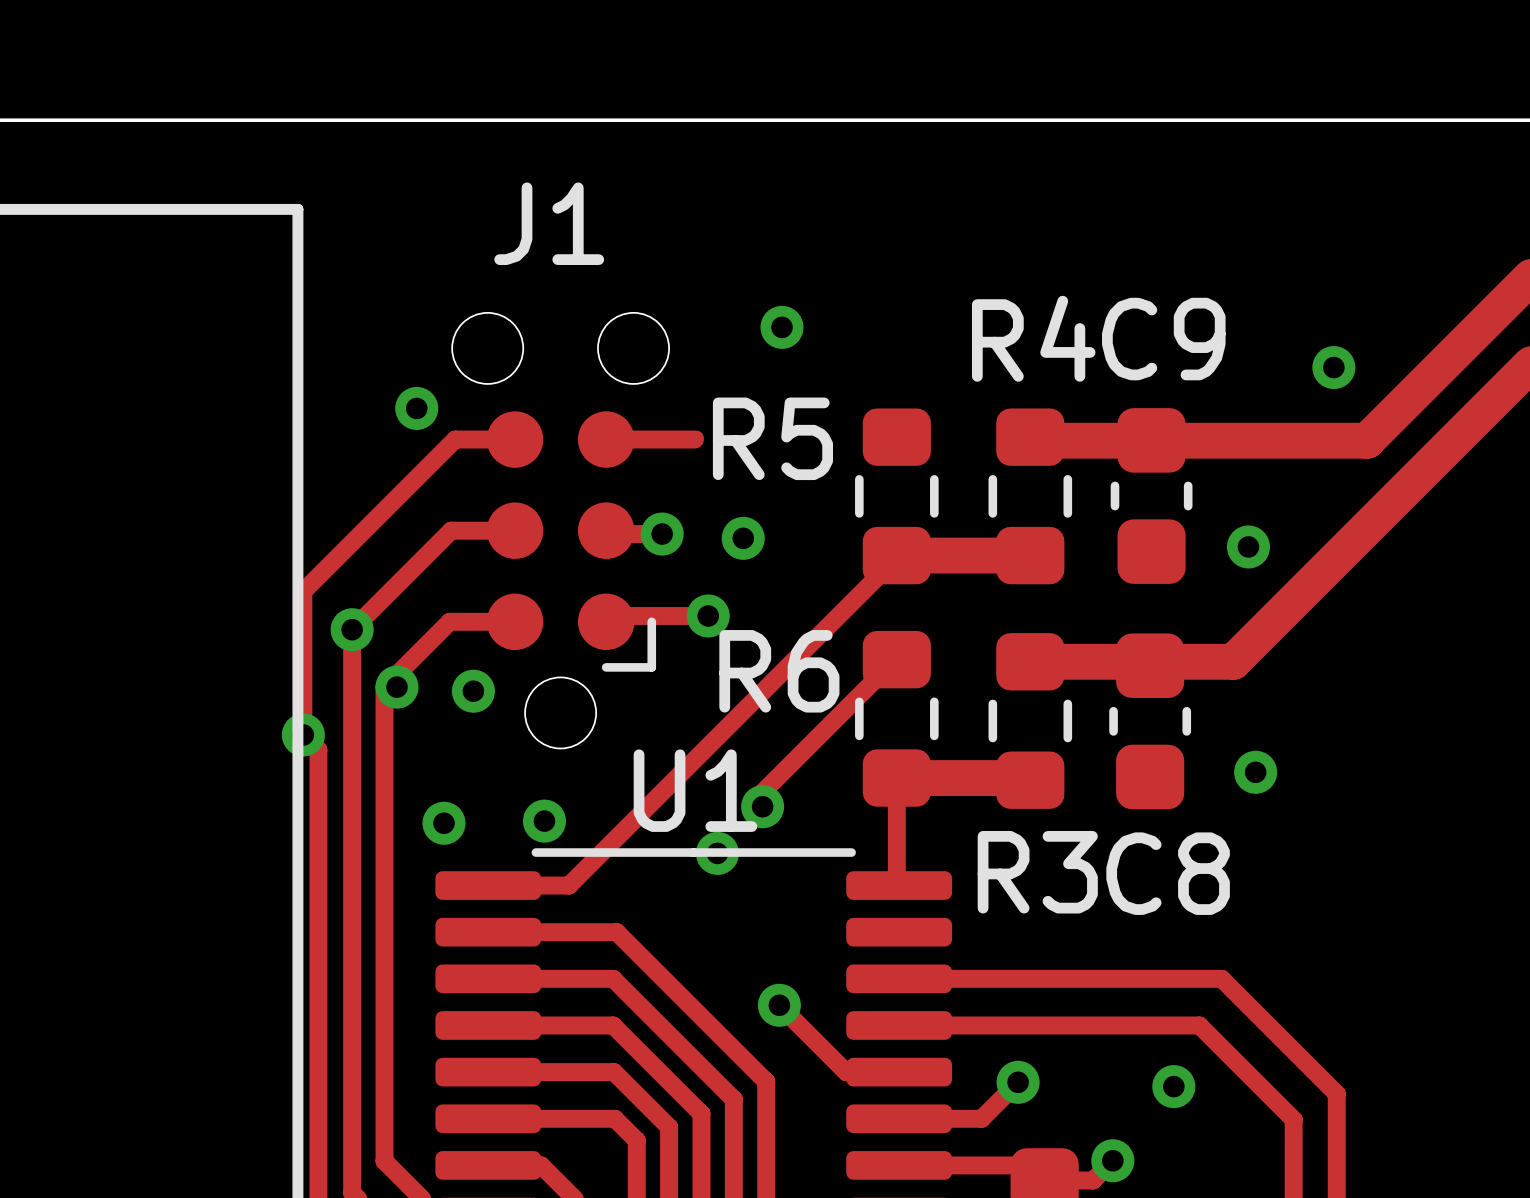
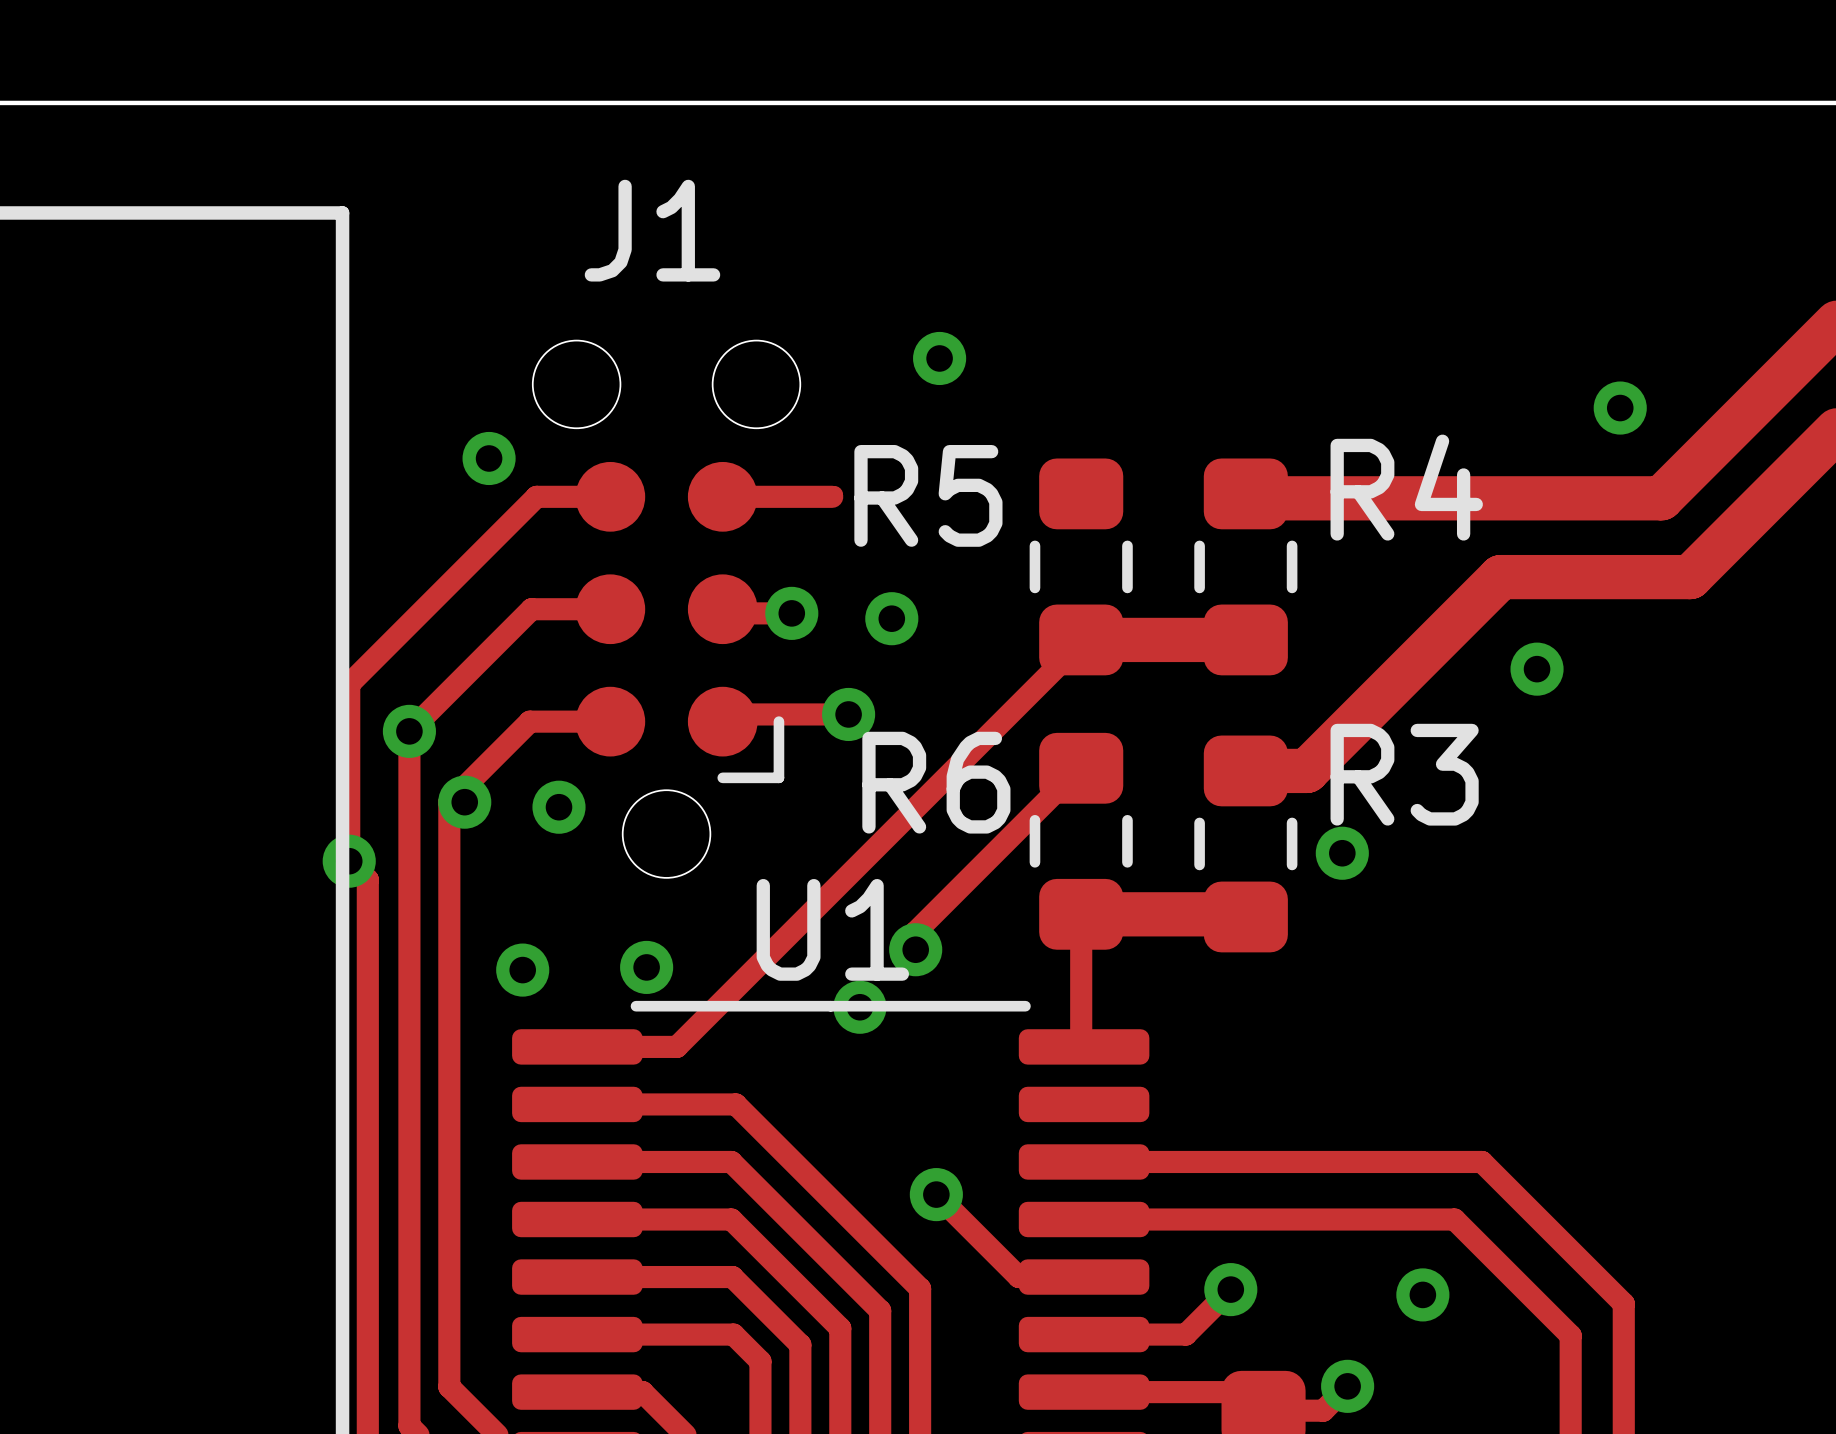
R4 name position: R4 (1033, 338) -> R4 (1406, 487)
C9: (1151, 496) -> none
track: (1390, 504) (1233, 661) (1079, 661) -> (1690, 577) (1500, 577) (1306, 770)
via position: (1248, 546) -> (1537, 669)
C8: (1150, 721) -> none
via: none -> (1342, 853)
via: (1255, 772) -> none
R3 name position: R3 (1037, 872) -> R3 (1404, 774)

